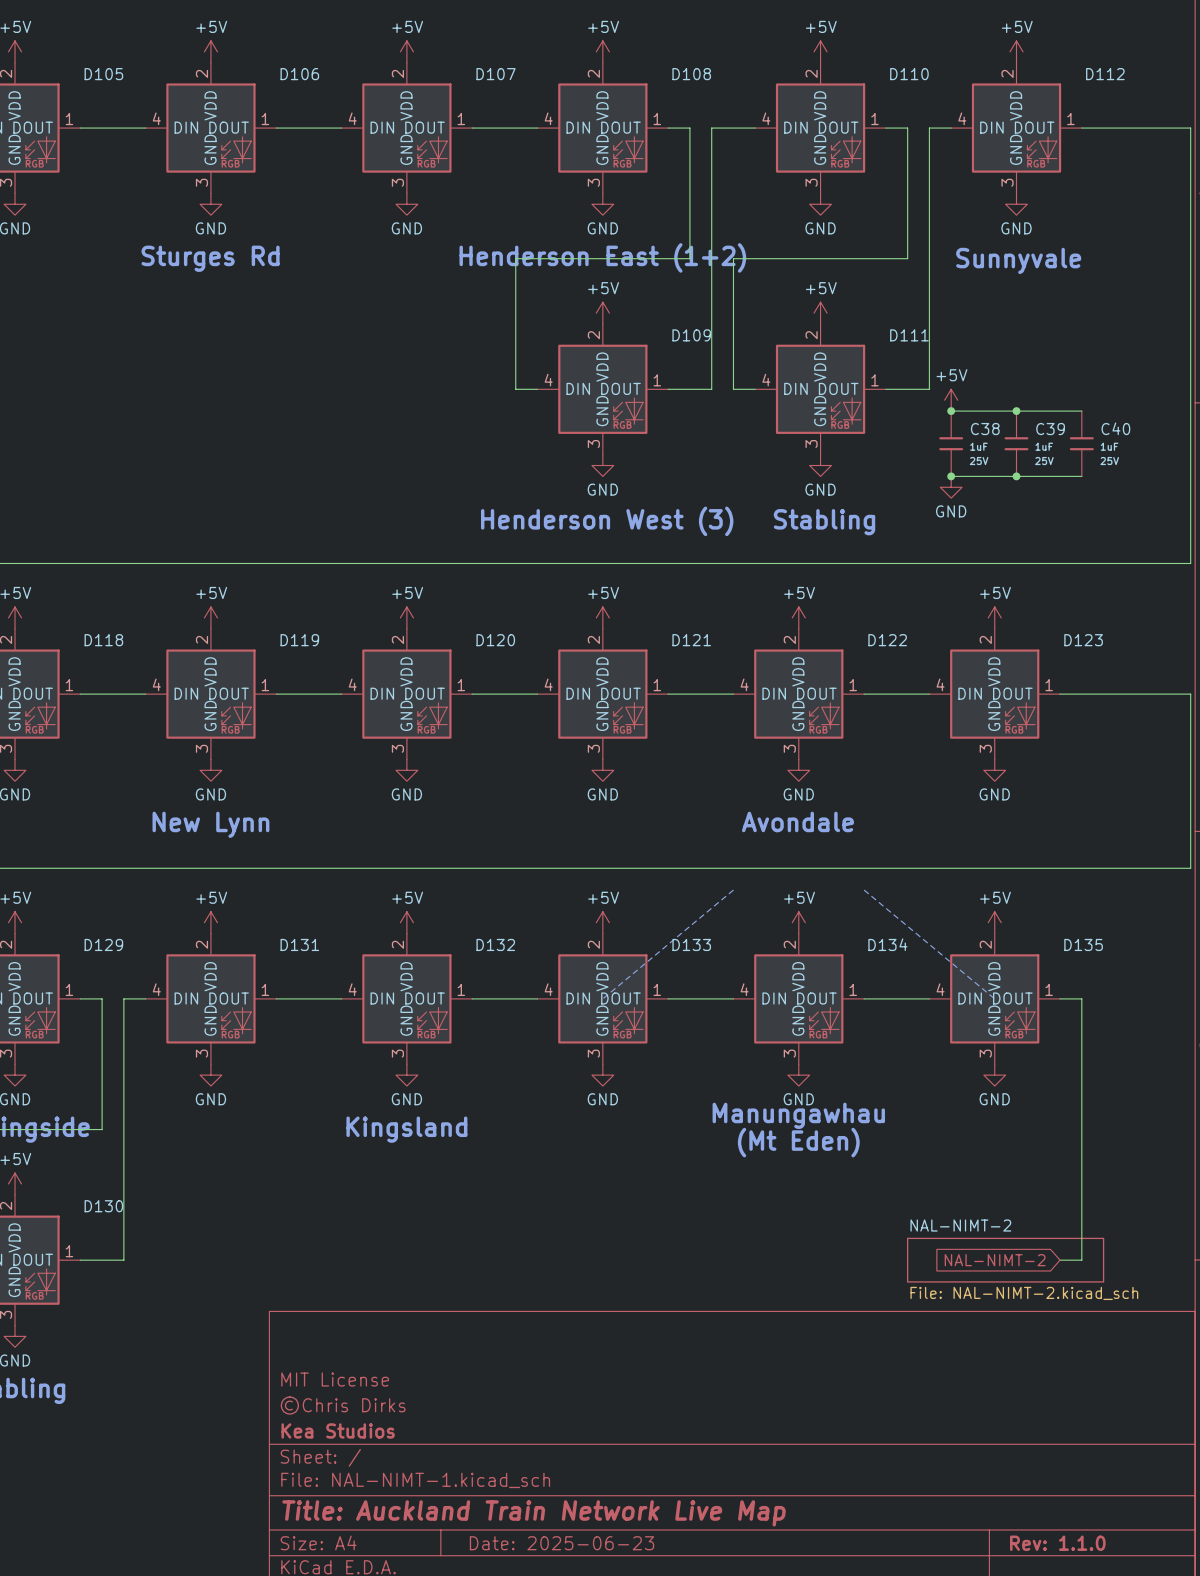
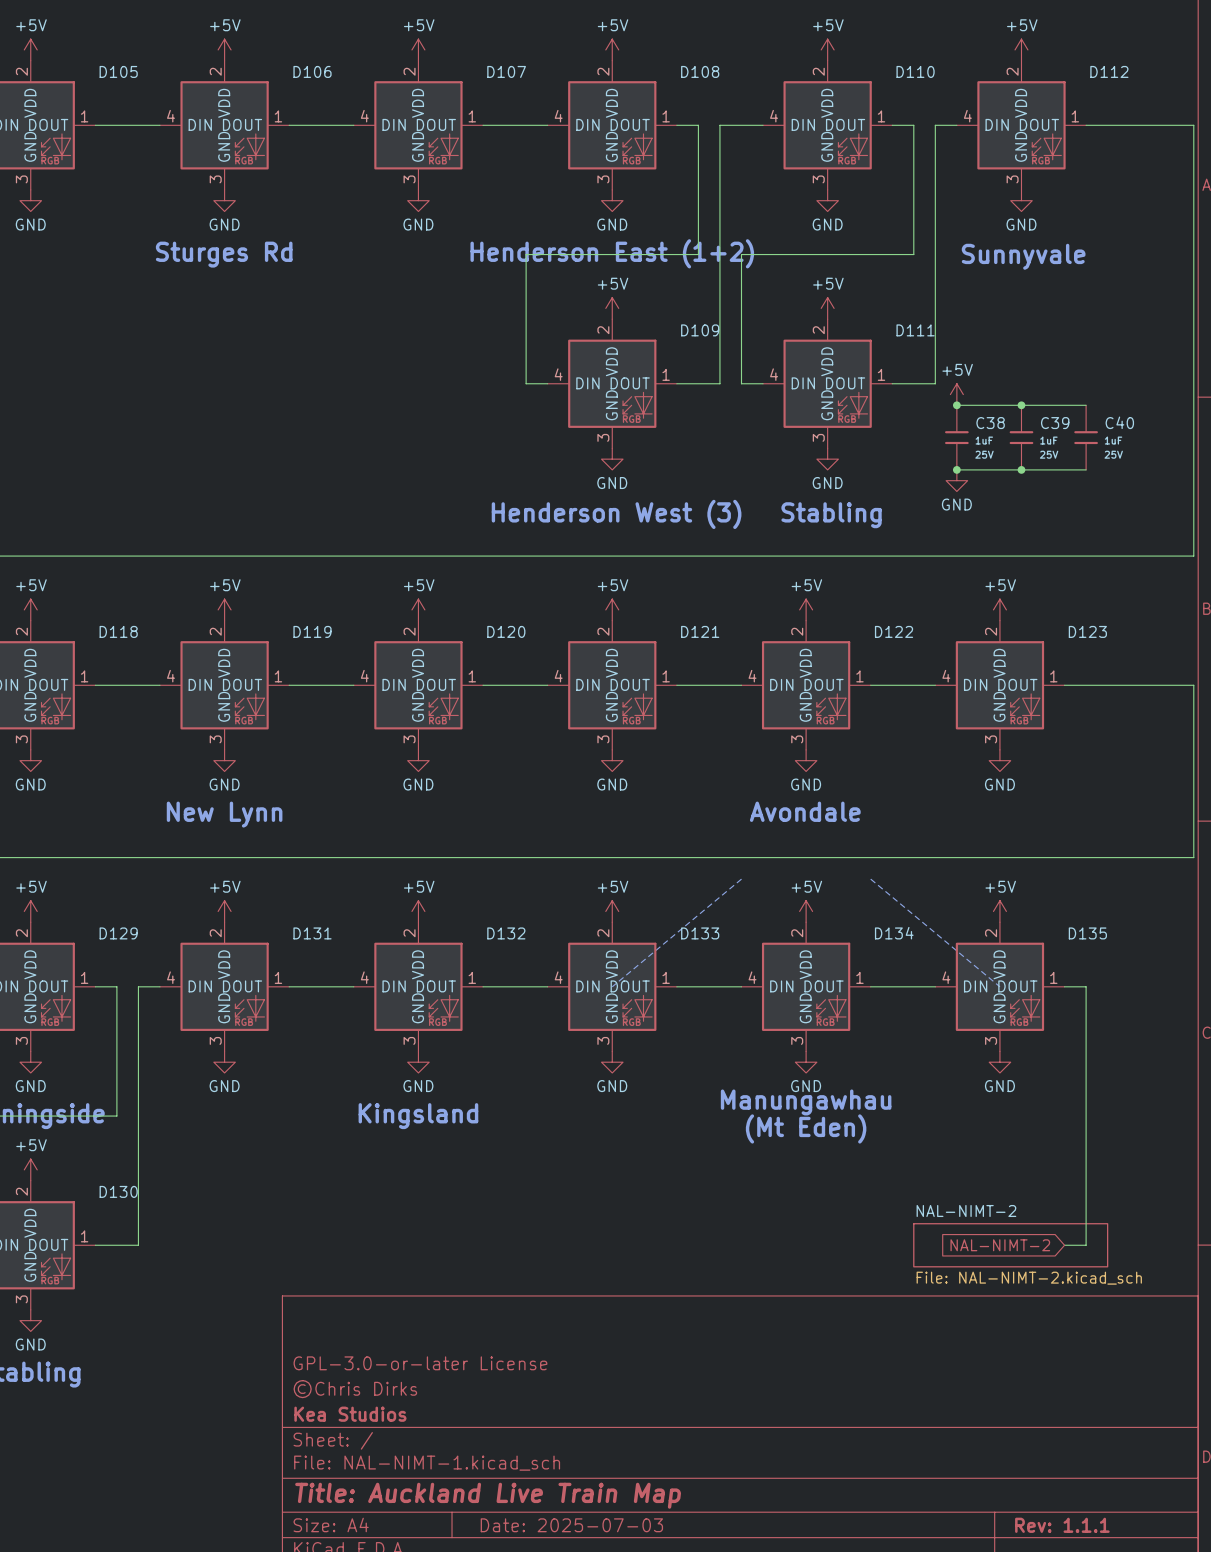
title block: MIT License (335, 1379) -> GPL-3.0-or-later License (420, 1363)
title block: Title: Auckland Train Network Live Map (534, 1513) -> Title: Auckland Live Train Map (488, 1495)
title block: Date: 2025-06-23 (562, 1543) -> Date: 2025-07-03 (571, 1525)
title block: Rev: 1.1.0 (1057, 1543) -> Rev: 1.1.1 (1062, 1525)

